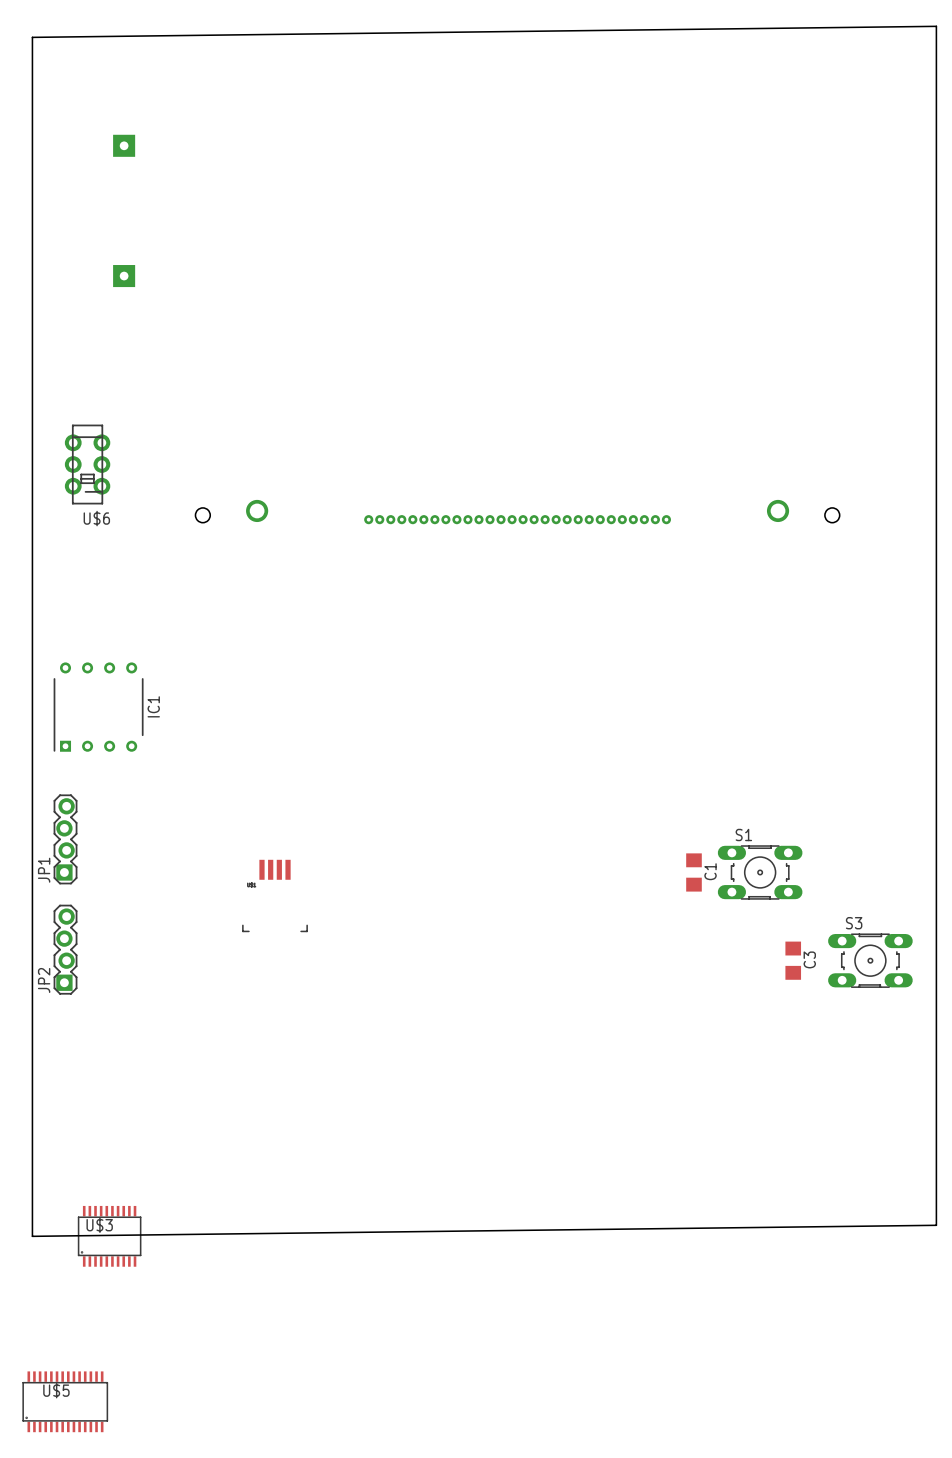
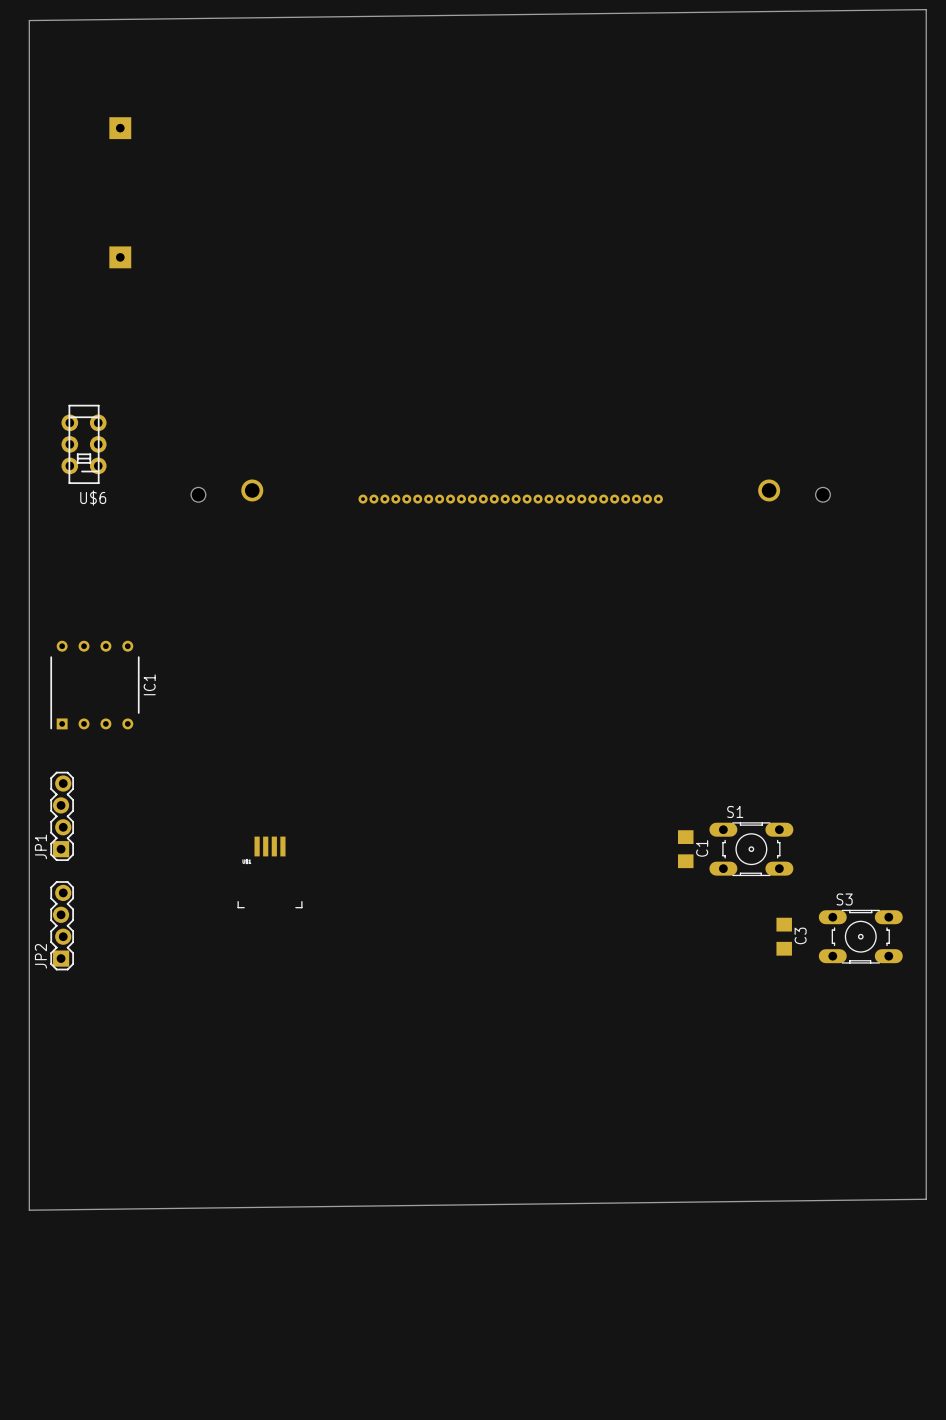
U$3: (109, 1236) -> none
U$5: (65, 1401) -> none

